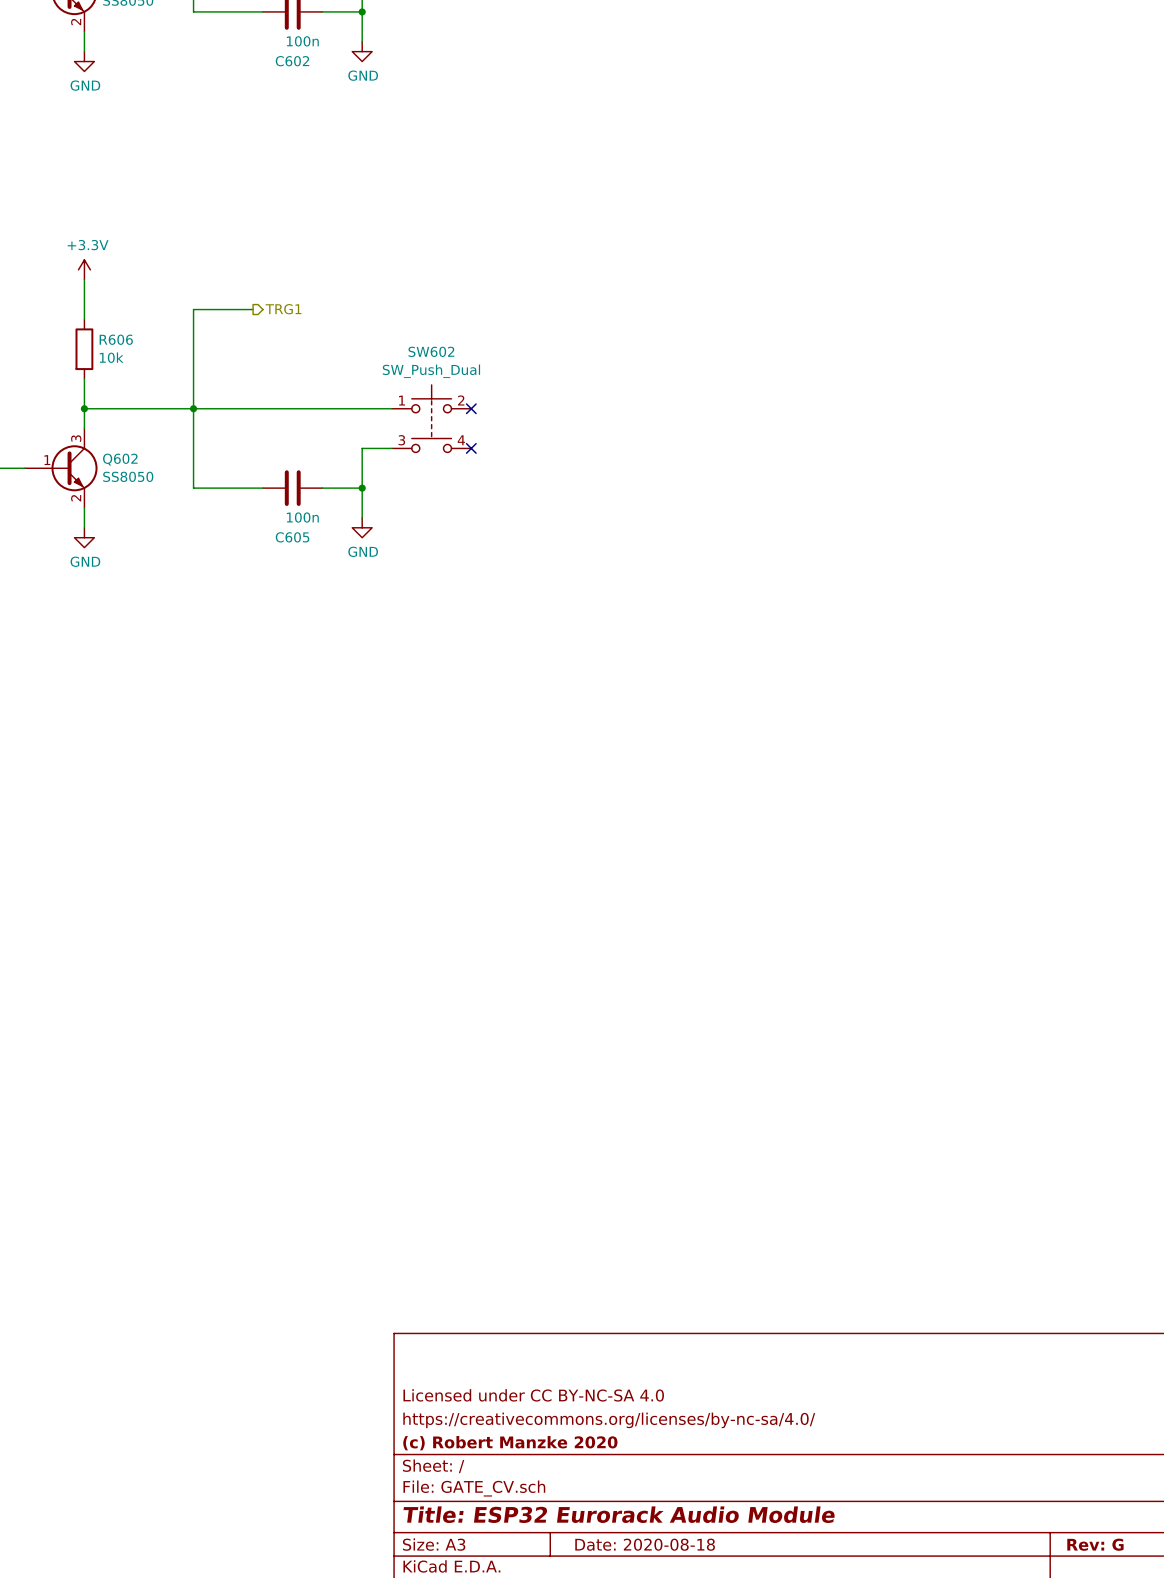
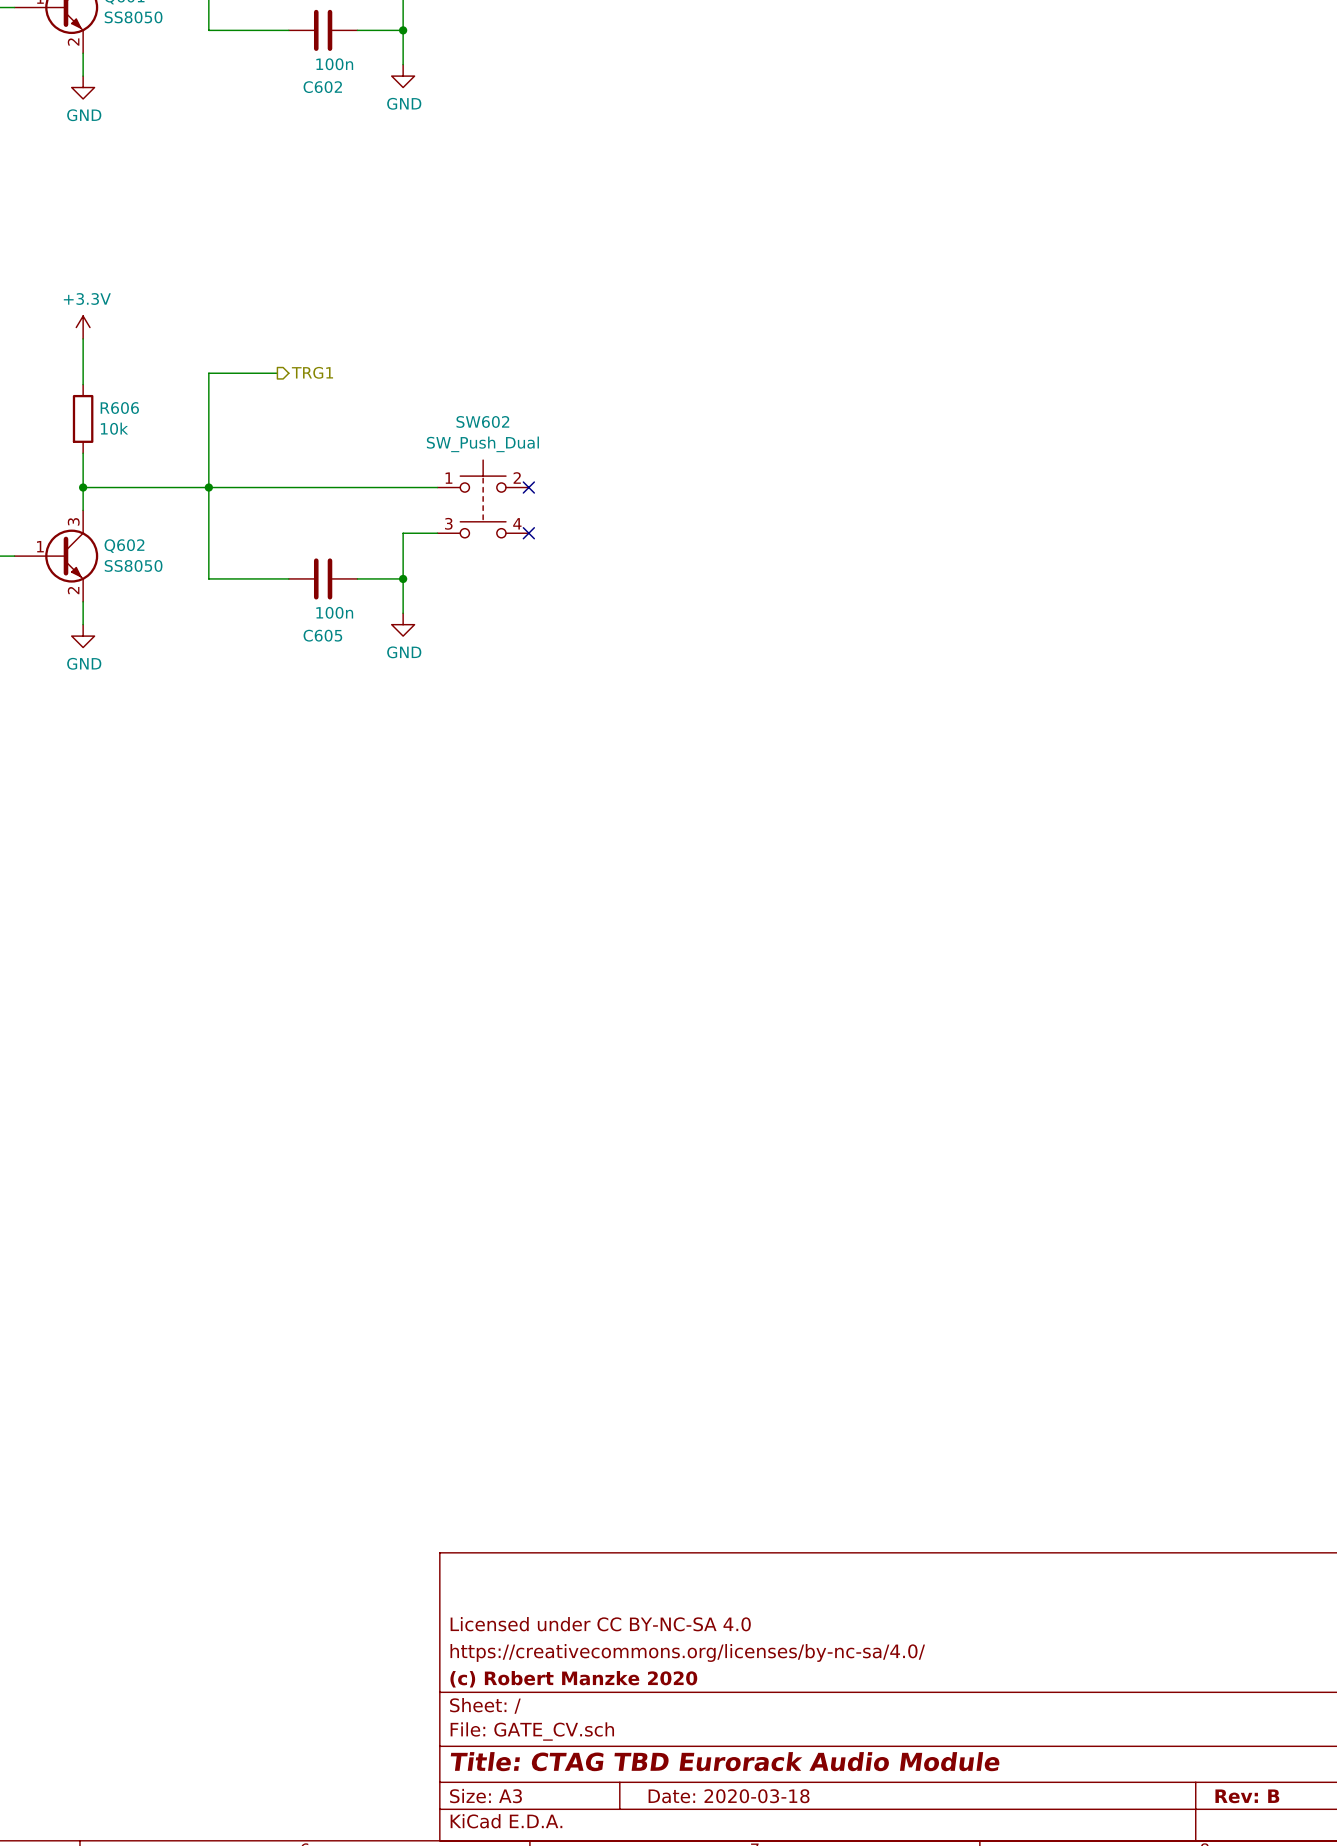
title block: Title: ESP32 Eurorack Audio Module (619, 1514) -> Title: CTAG TBD Eurorack Audio Module (725, 1761)
title block: Date: 2020-08-18 (645, 1544) -> Date: 2020-03-18 (729, 1796)
title block: Rev: G (1095, 1544) -> Rev: B (1247, 1796)

